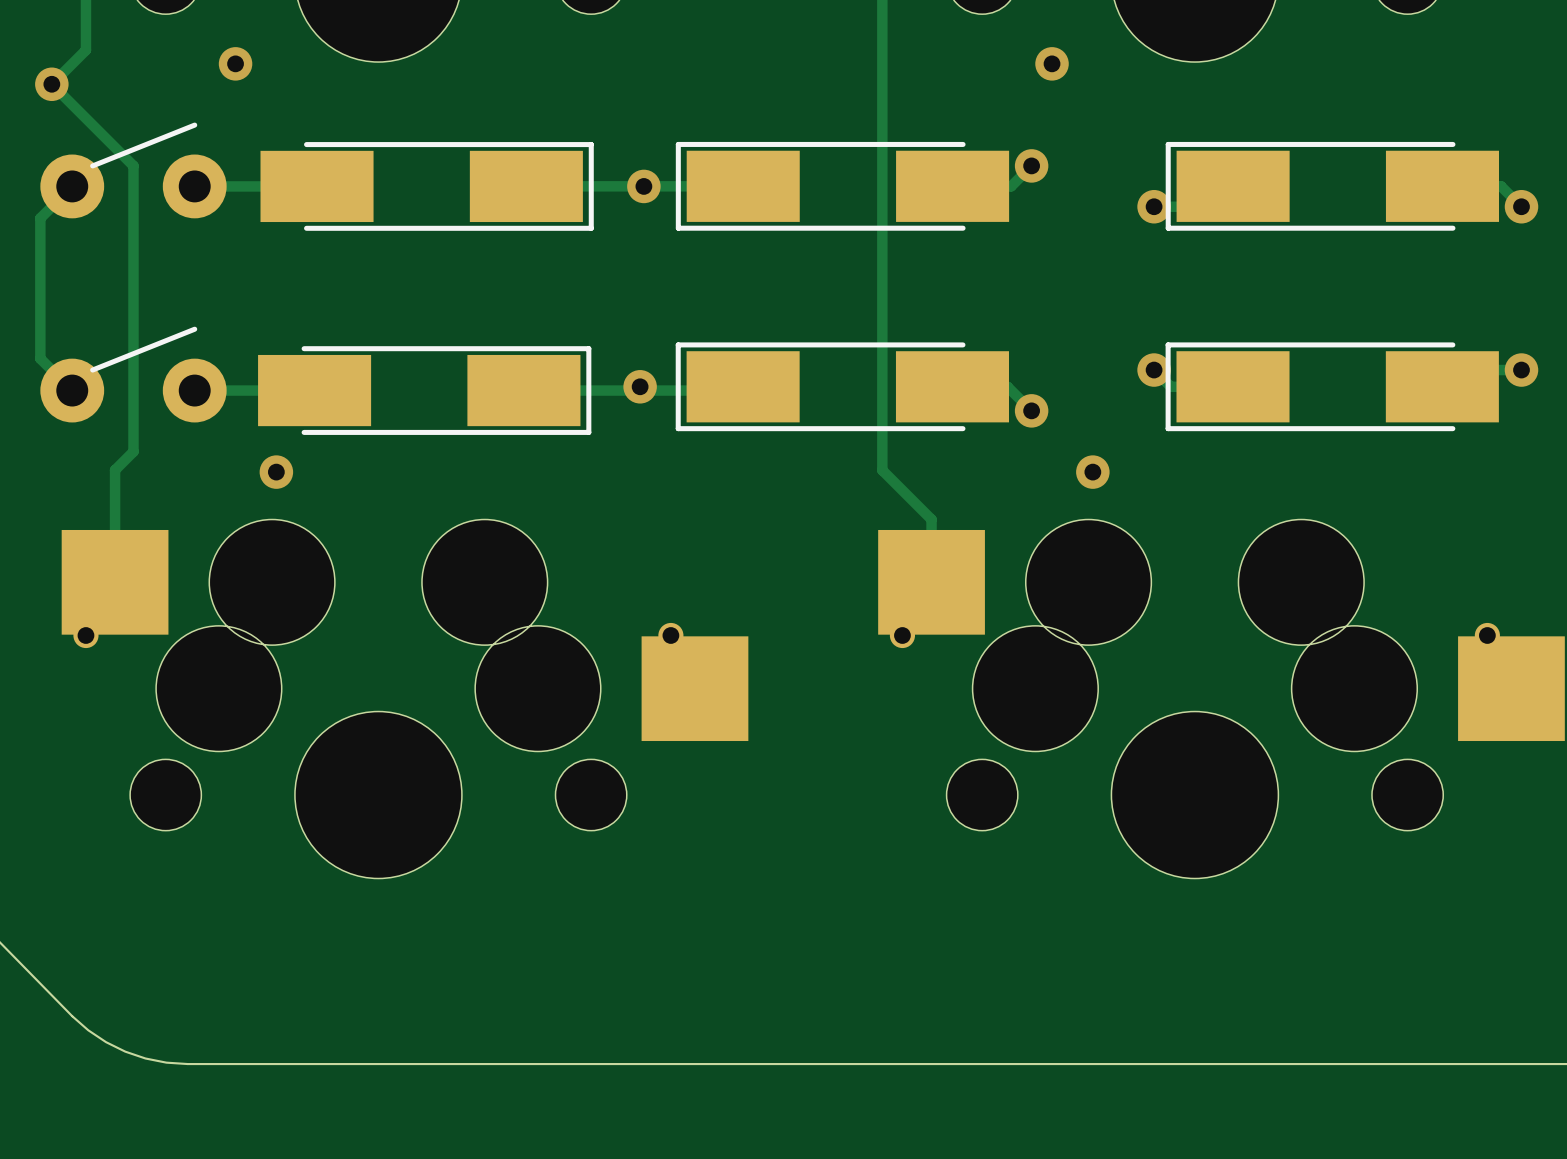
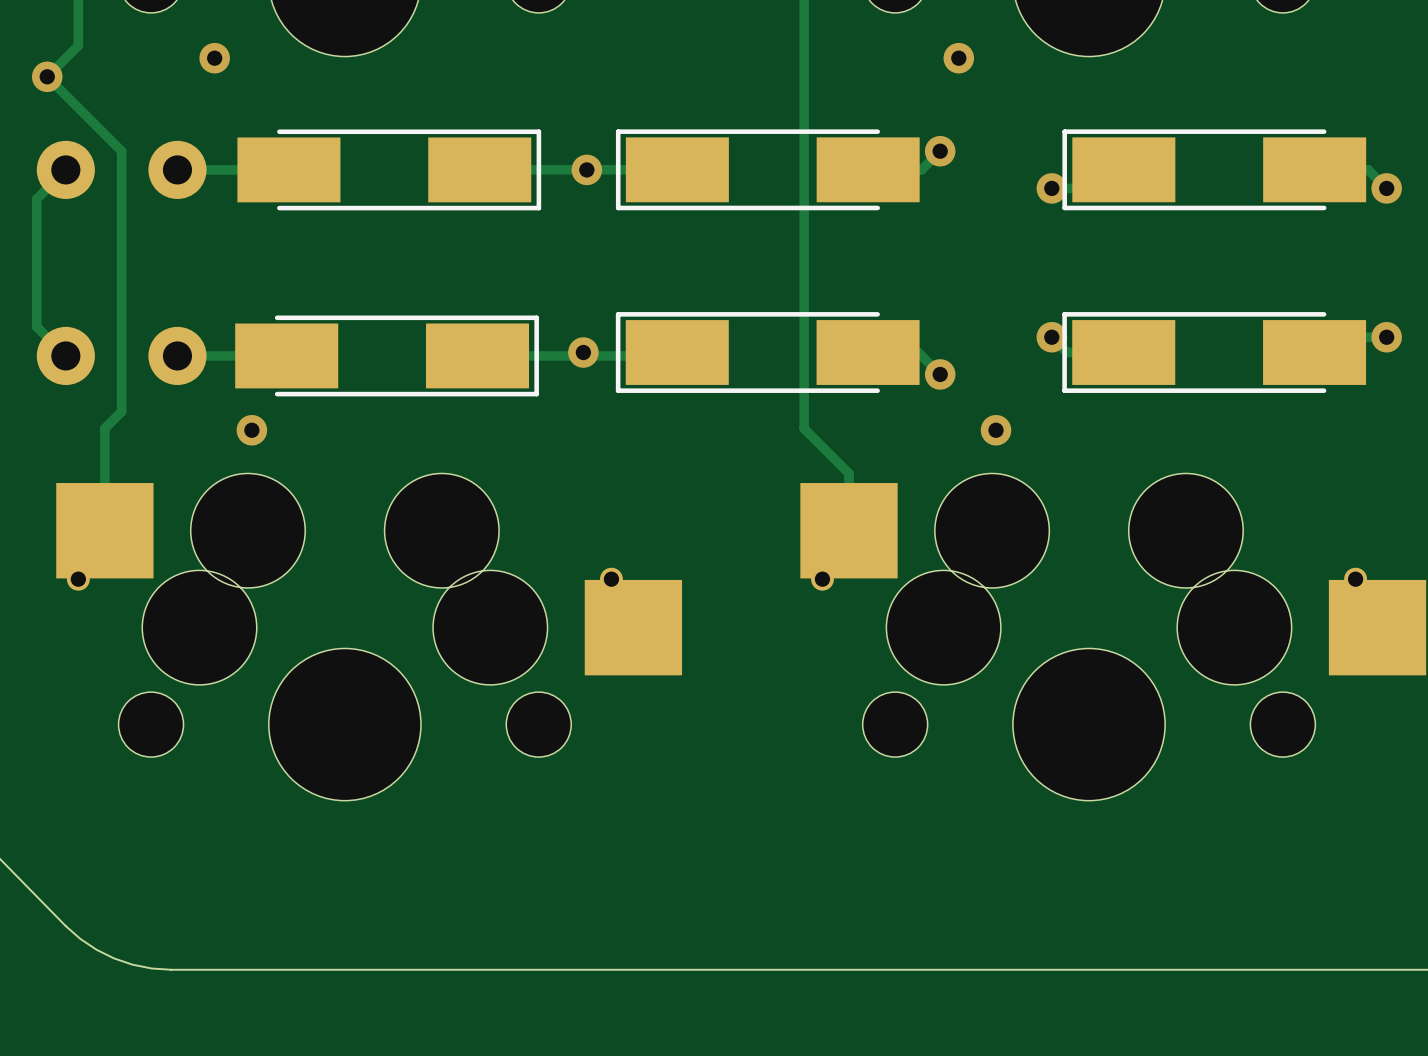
line: (194, 125) (92, 165) -> none
line: (194, 329) (92, 370) -> none

